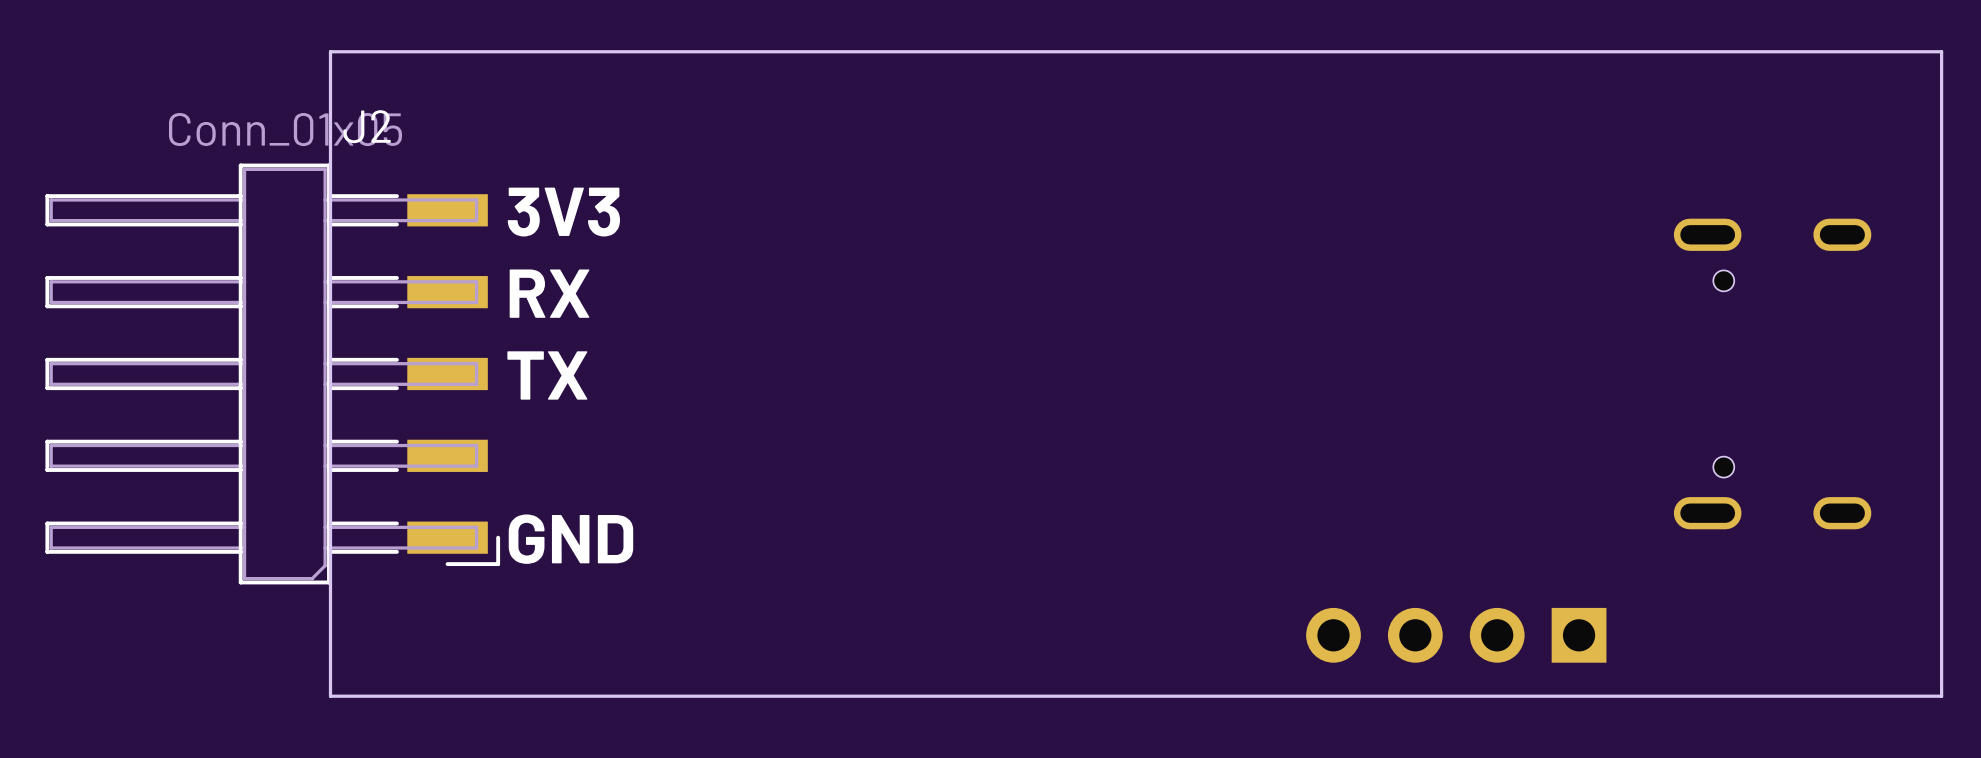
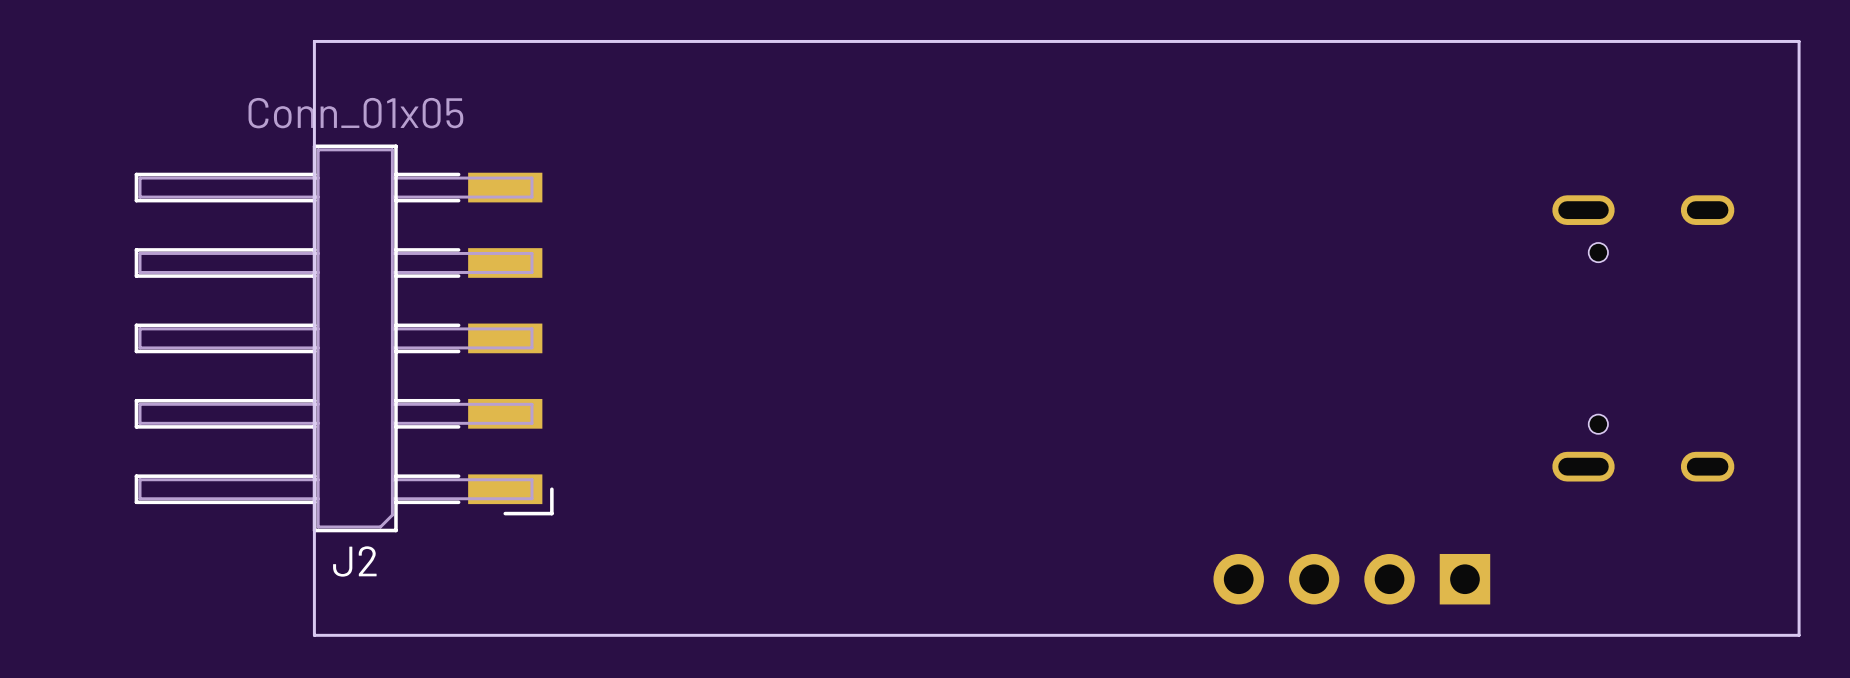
J2 name position: J2 (367, 126) -> J2 (354, 561)
text: 3V3 (563, 212) -> none
text: RX (549, 293) -> none
J2 position: (272, 373) -> (344, 338)
text: TX (547, 375) -> none
text: GND (570, 539) -> none

